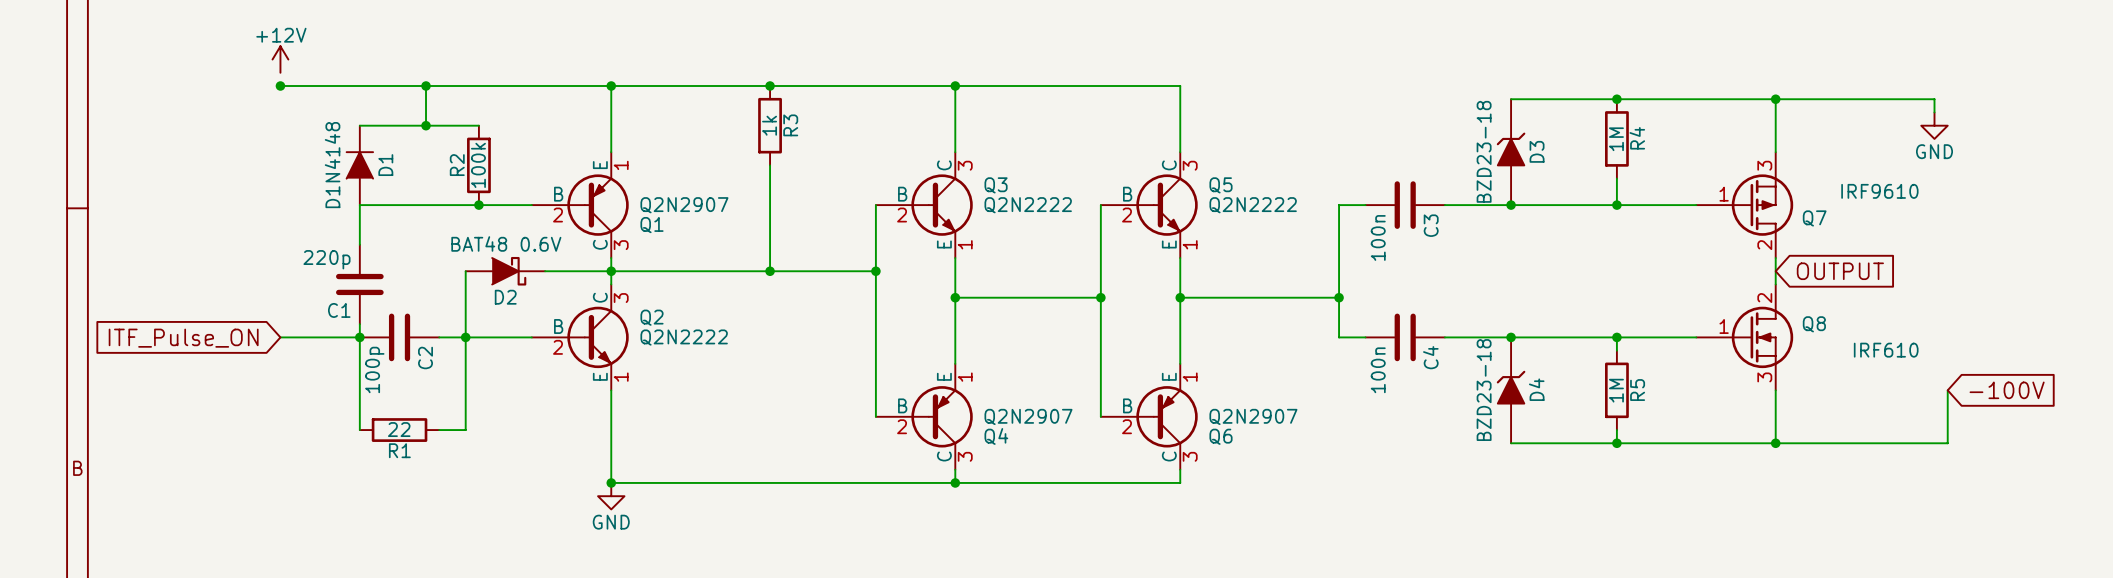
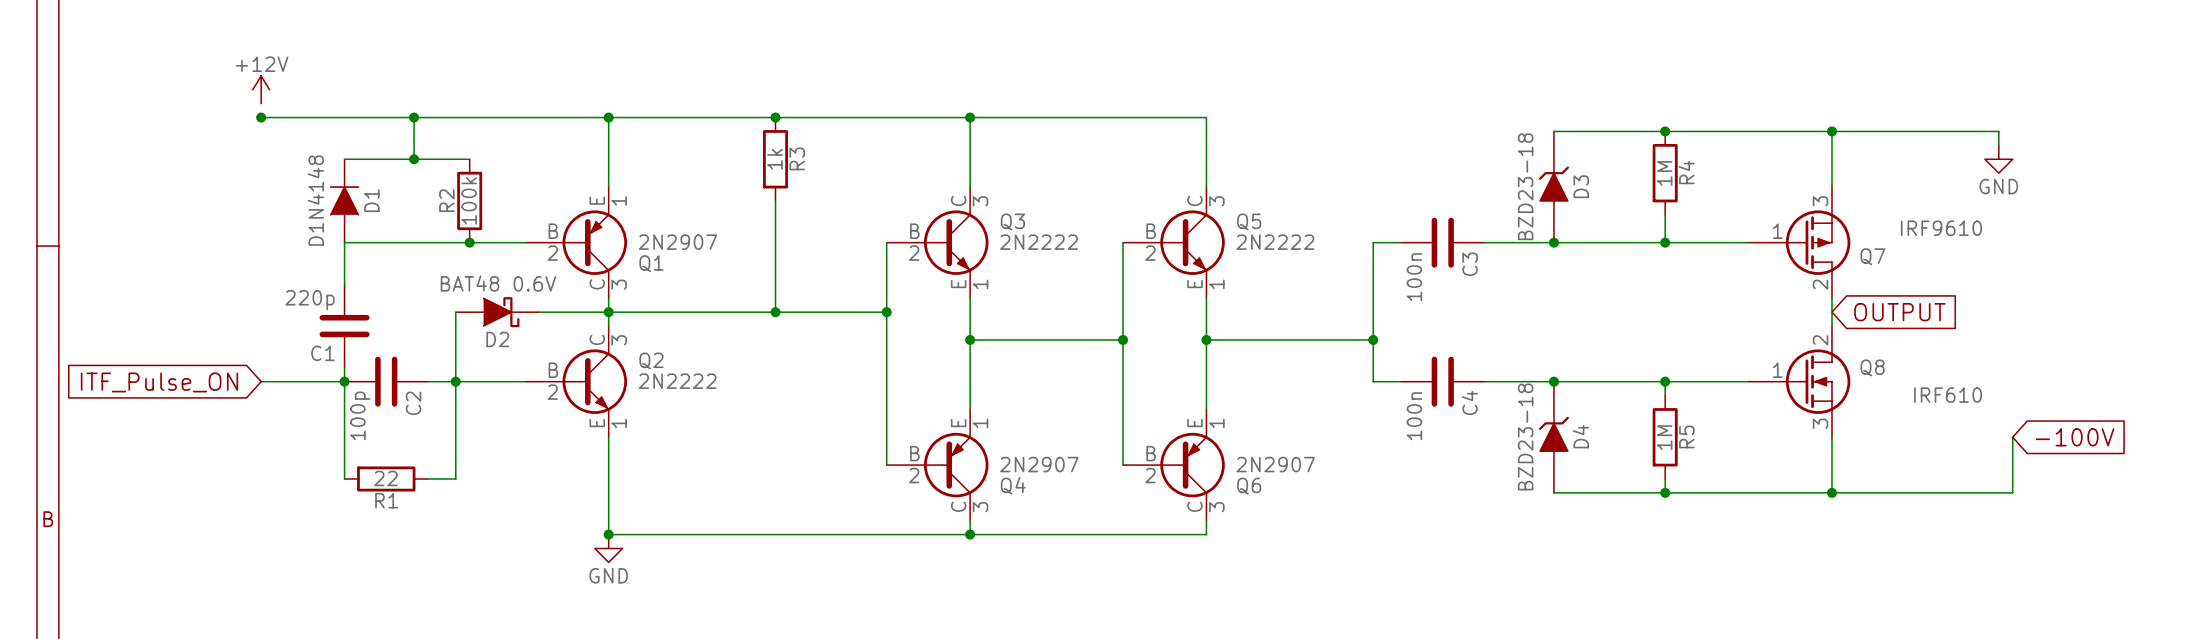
Q1 value: Q2N2907 (684, 205) -> 2N2907 (677, 242)
Q3 value: Q2N2222 (1028, 205) -> 2N2222 (1039, 242)
Q5 value: Q2N2222 (1253, 205) -> 2N2222 (1275, 242)
Q2 value: Q2N2222 (684, 337) -> 2N2222 (677, 381)
Q4 value: Q2N2907 (1028, 416) -> 2N2907 (1039, 464)
Q6 value: Q2N2907 (1253, 416) -> 2N2907 (1275, 464)

